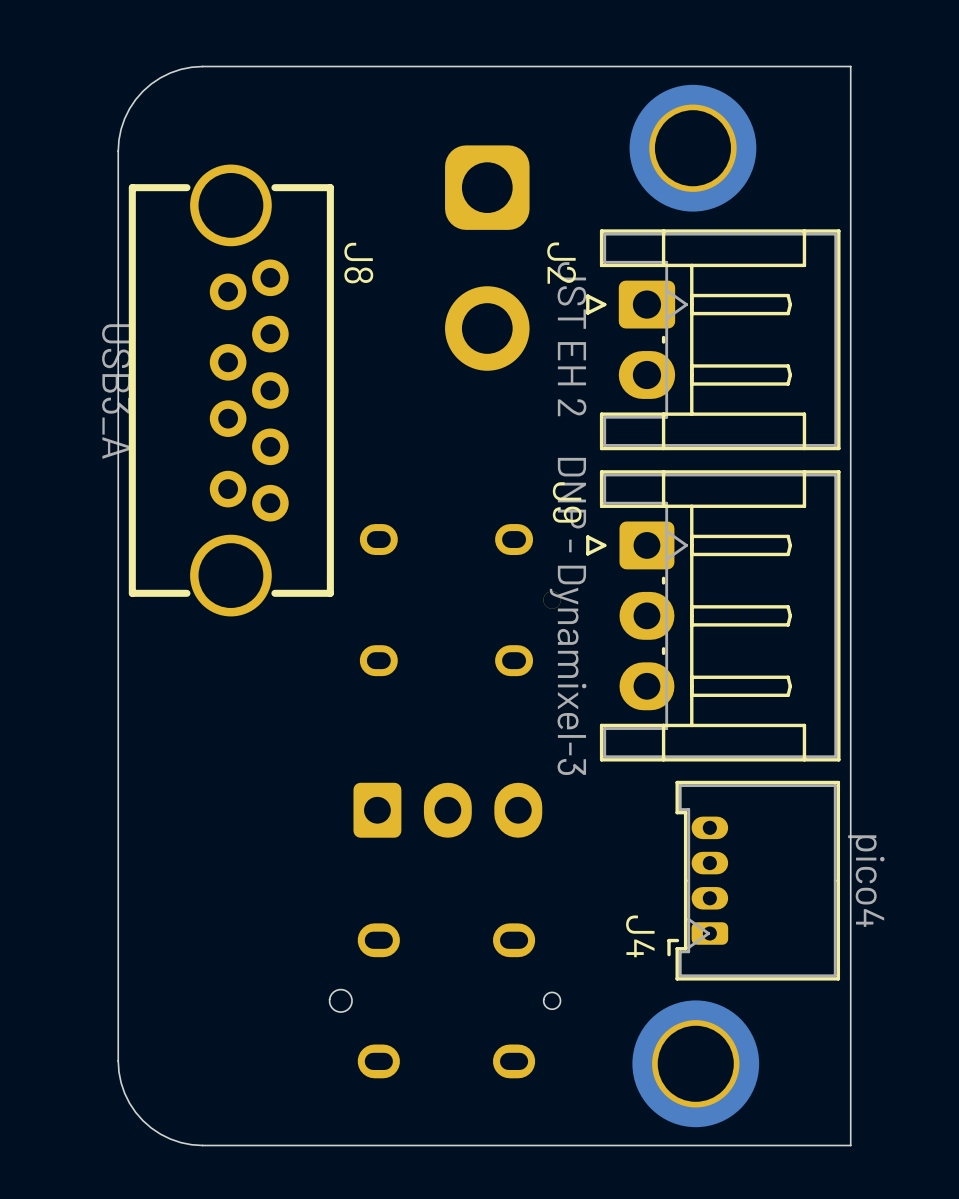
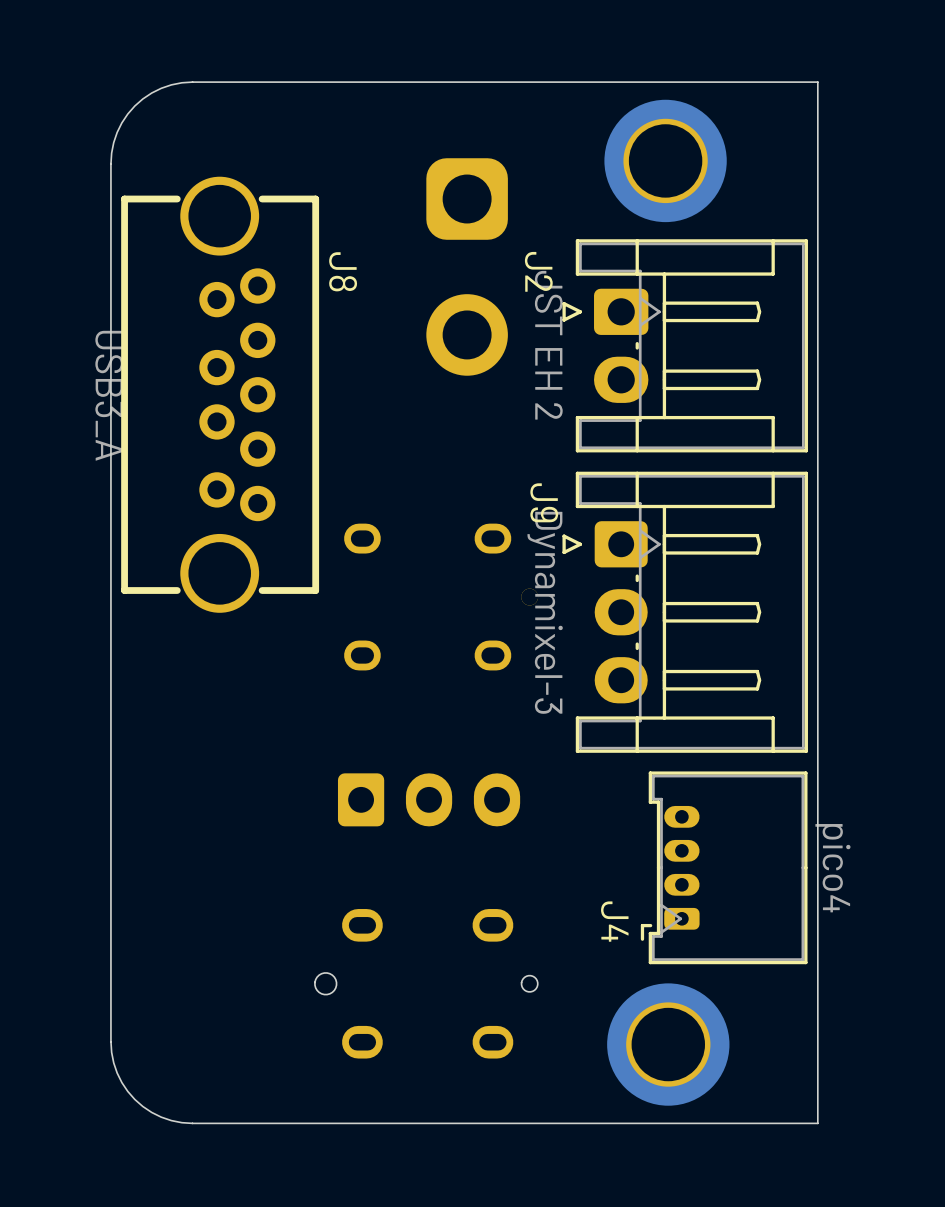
J9 value: DNP - Dynamixel-3 (568, 616) -> Dynamixel-3 (545, 612)

